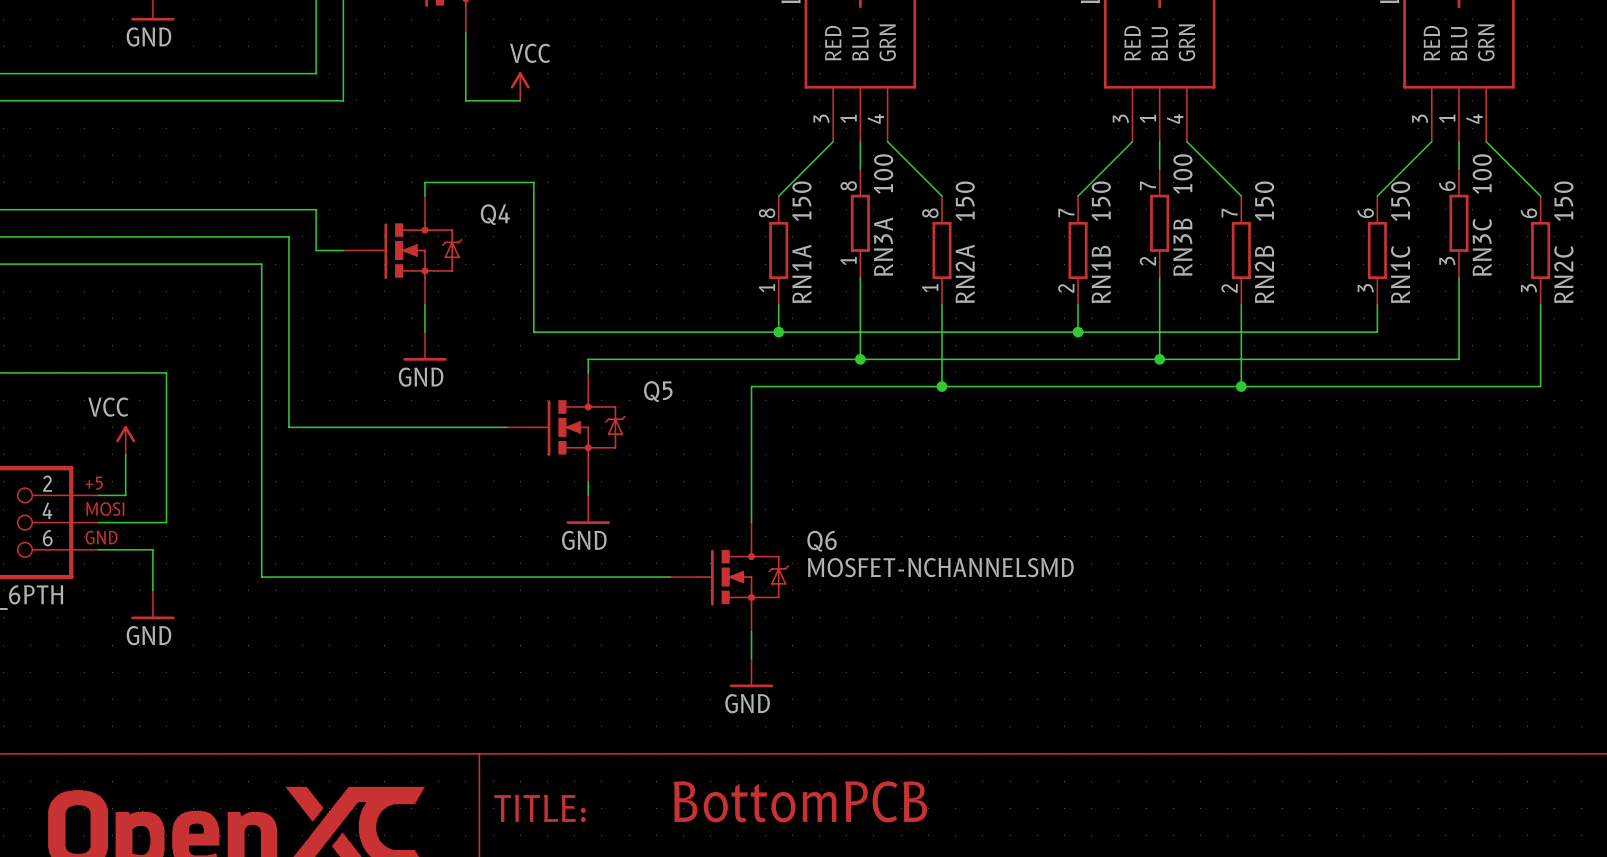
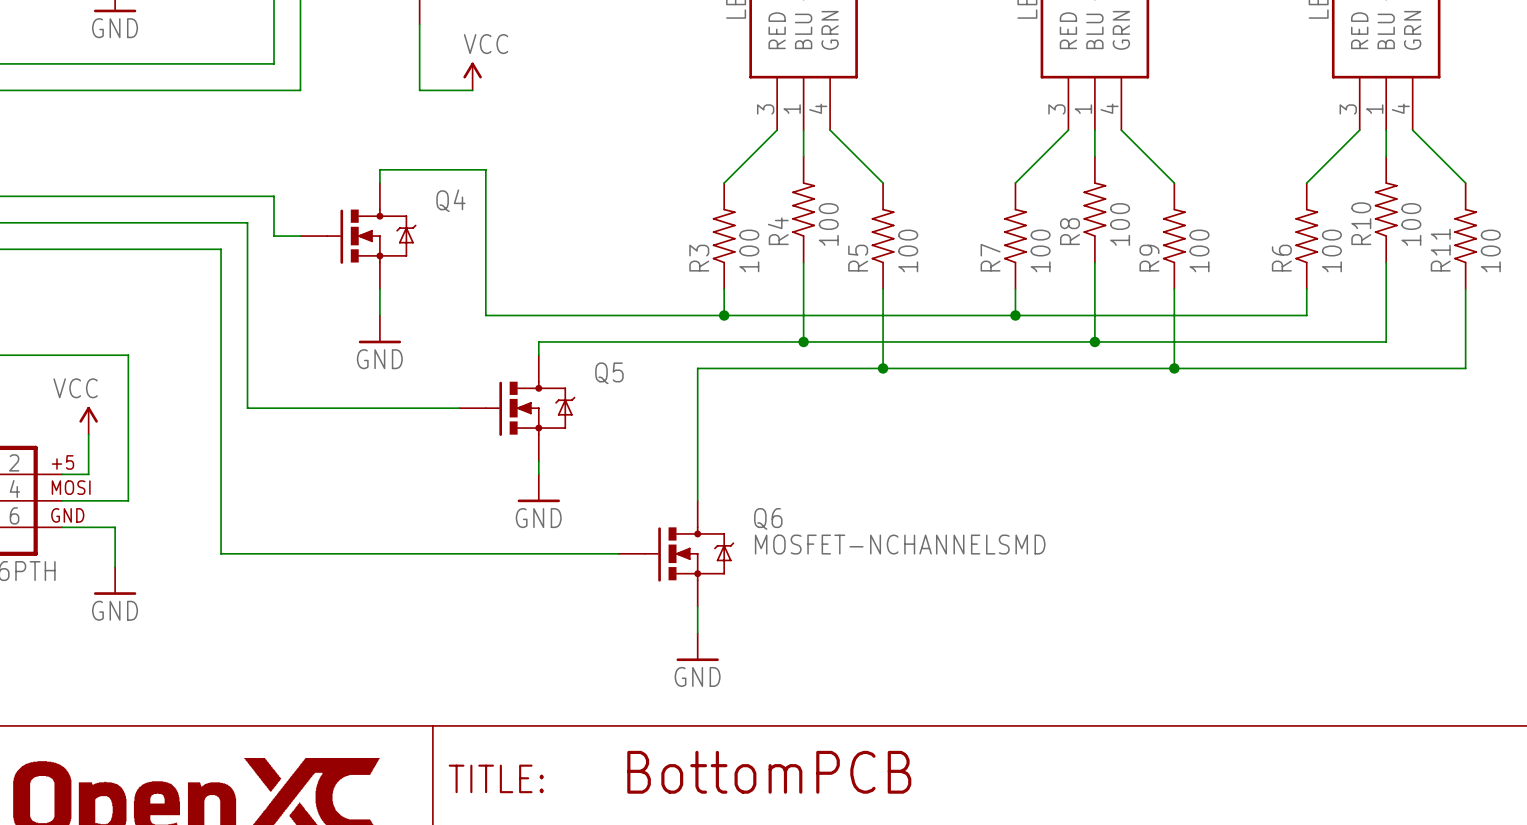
RN3A: 100 (860, 223) -> none
R4: none -> 100 (803, 209)
RN3B: 100 (1159, 223) -> none
R8: none -> 100 (1094, 209)
RN3C: 100 (1459, 223) -> none
R10: none -> 100 (1386, 209)
RN1A: 150 (778, 250) -> none
R3: none -> 100 (724, 236)
RN2A: 150 (941, 250) -> none
R5: none -> 100 (883, 236)
RN1B: 150 (1078, 250) -> none
R7: none -> 100 (1015, 236)
RN2B: 150 (1241, 250) -> none
R9: none -> 100 (1174, 236)
RN1C: 150 (1377, 250) -> none
R6: none -> 100 (1306, 236)
RN2C: 150 (1540, 250) -> none
R11: none -> 100 (1465, 236)

